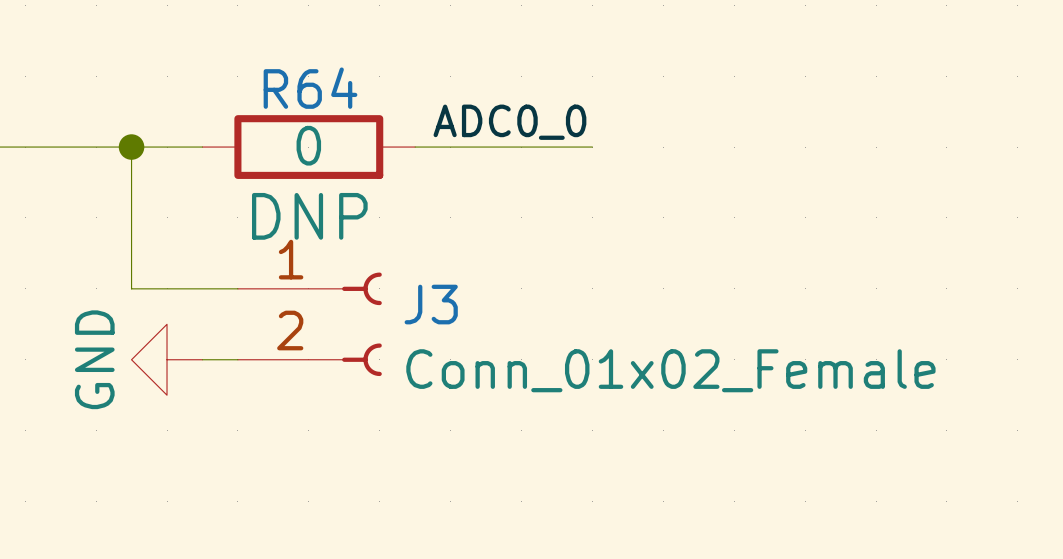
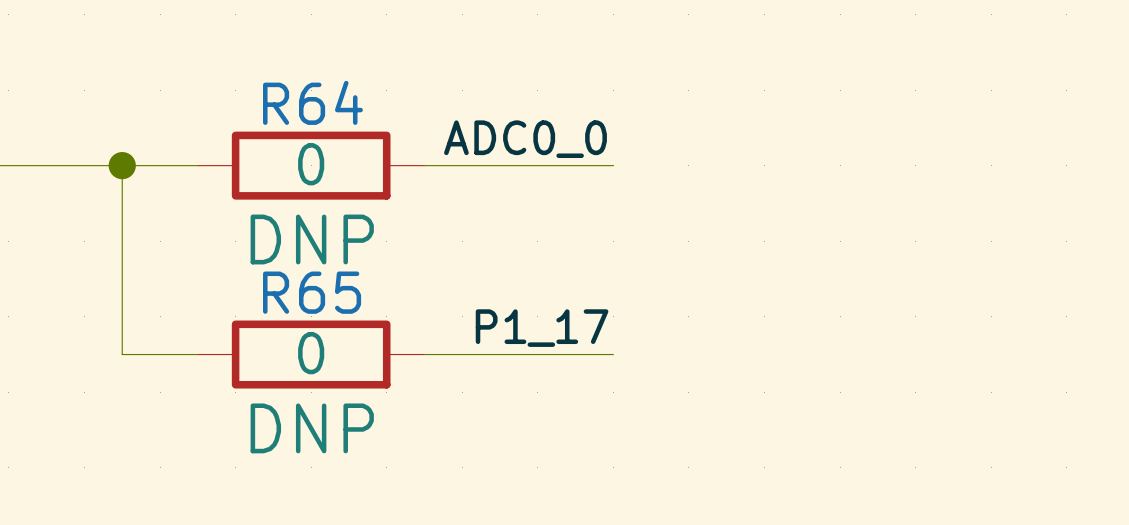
wire: (131, 288) (237, 288) -> (122, 316) (122, 354) (197, 354)
label: none -> P1_17 (542, 328)
R65: none -> 0 (311, 354)
J3: Conn_01x02_Female (309, 324) -> none
wire: none -> (424, 354) (613, 354)
power symbol: GND (167, 359) -> none
wire: (202, 359) (237, 359) -> none

